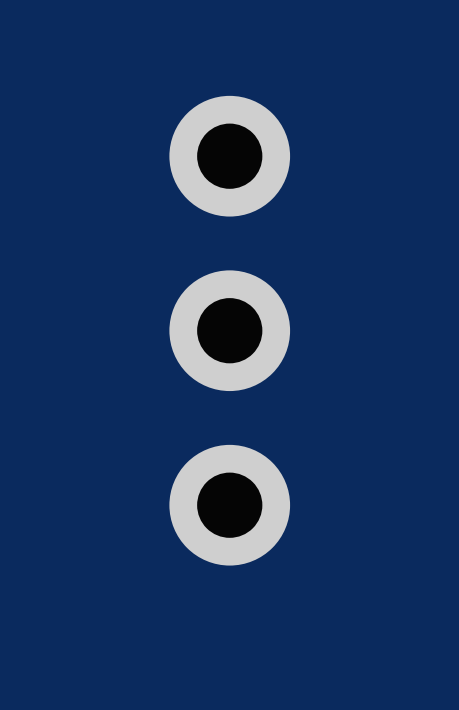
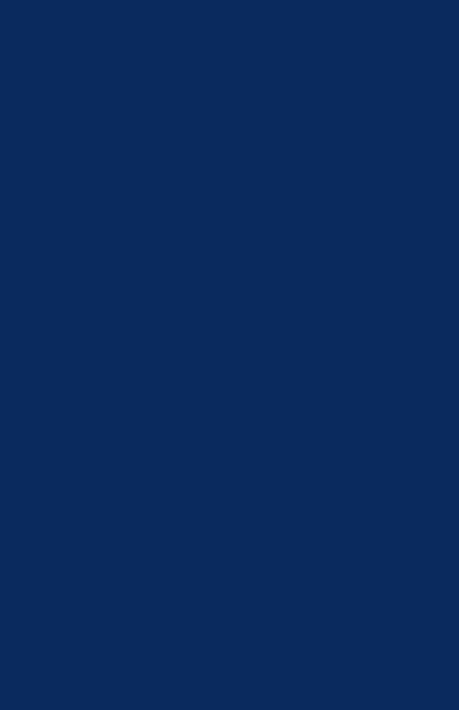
part: (229, 330) -> none

